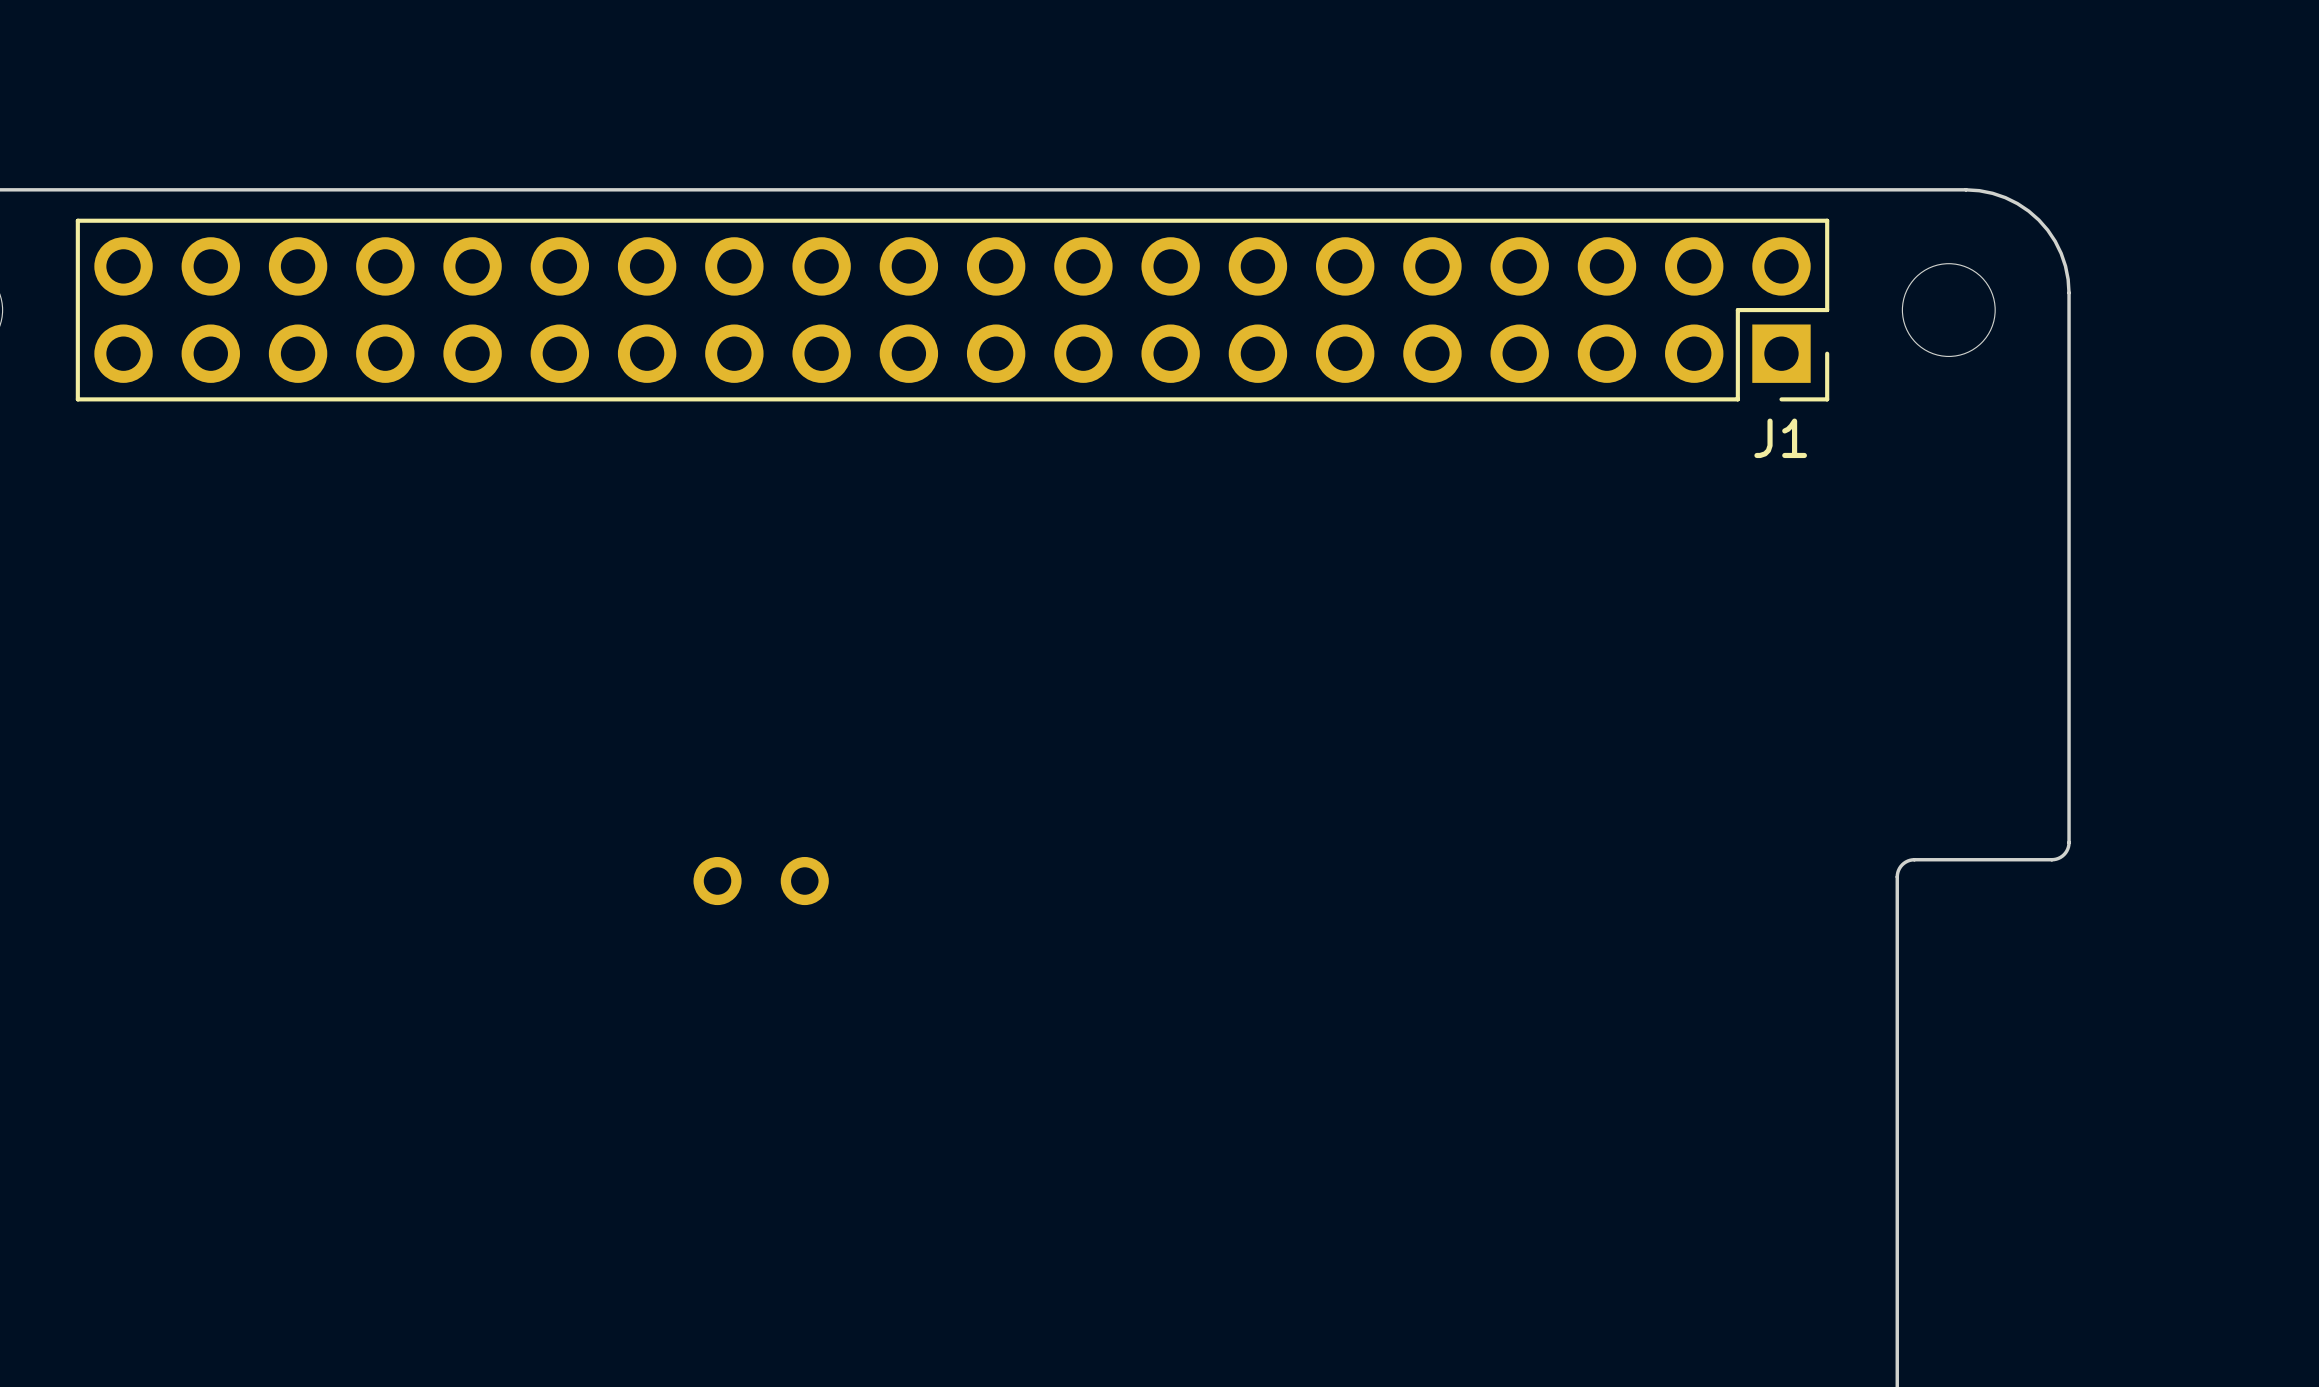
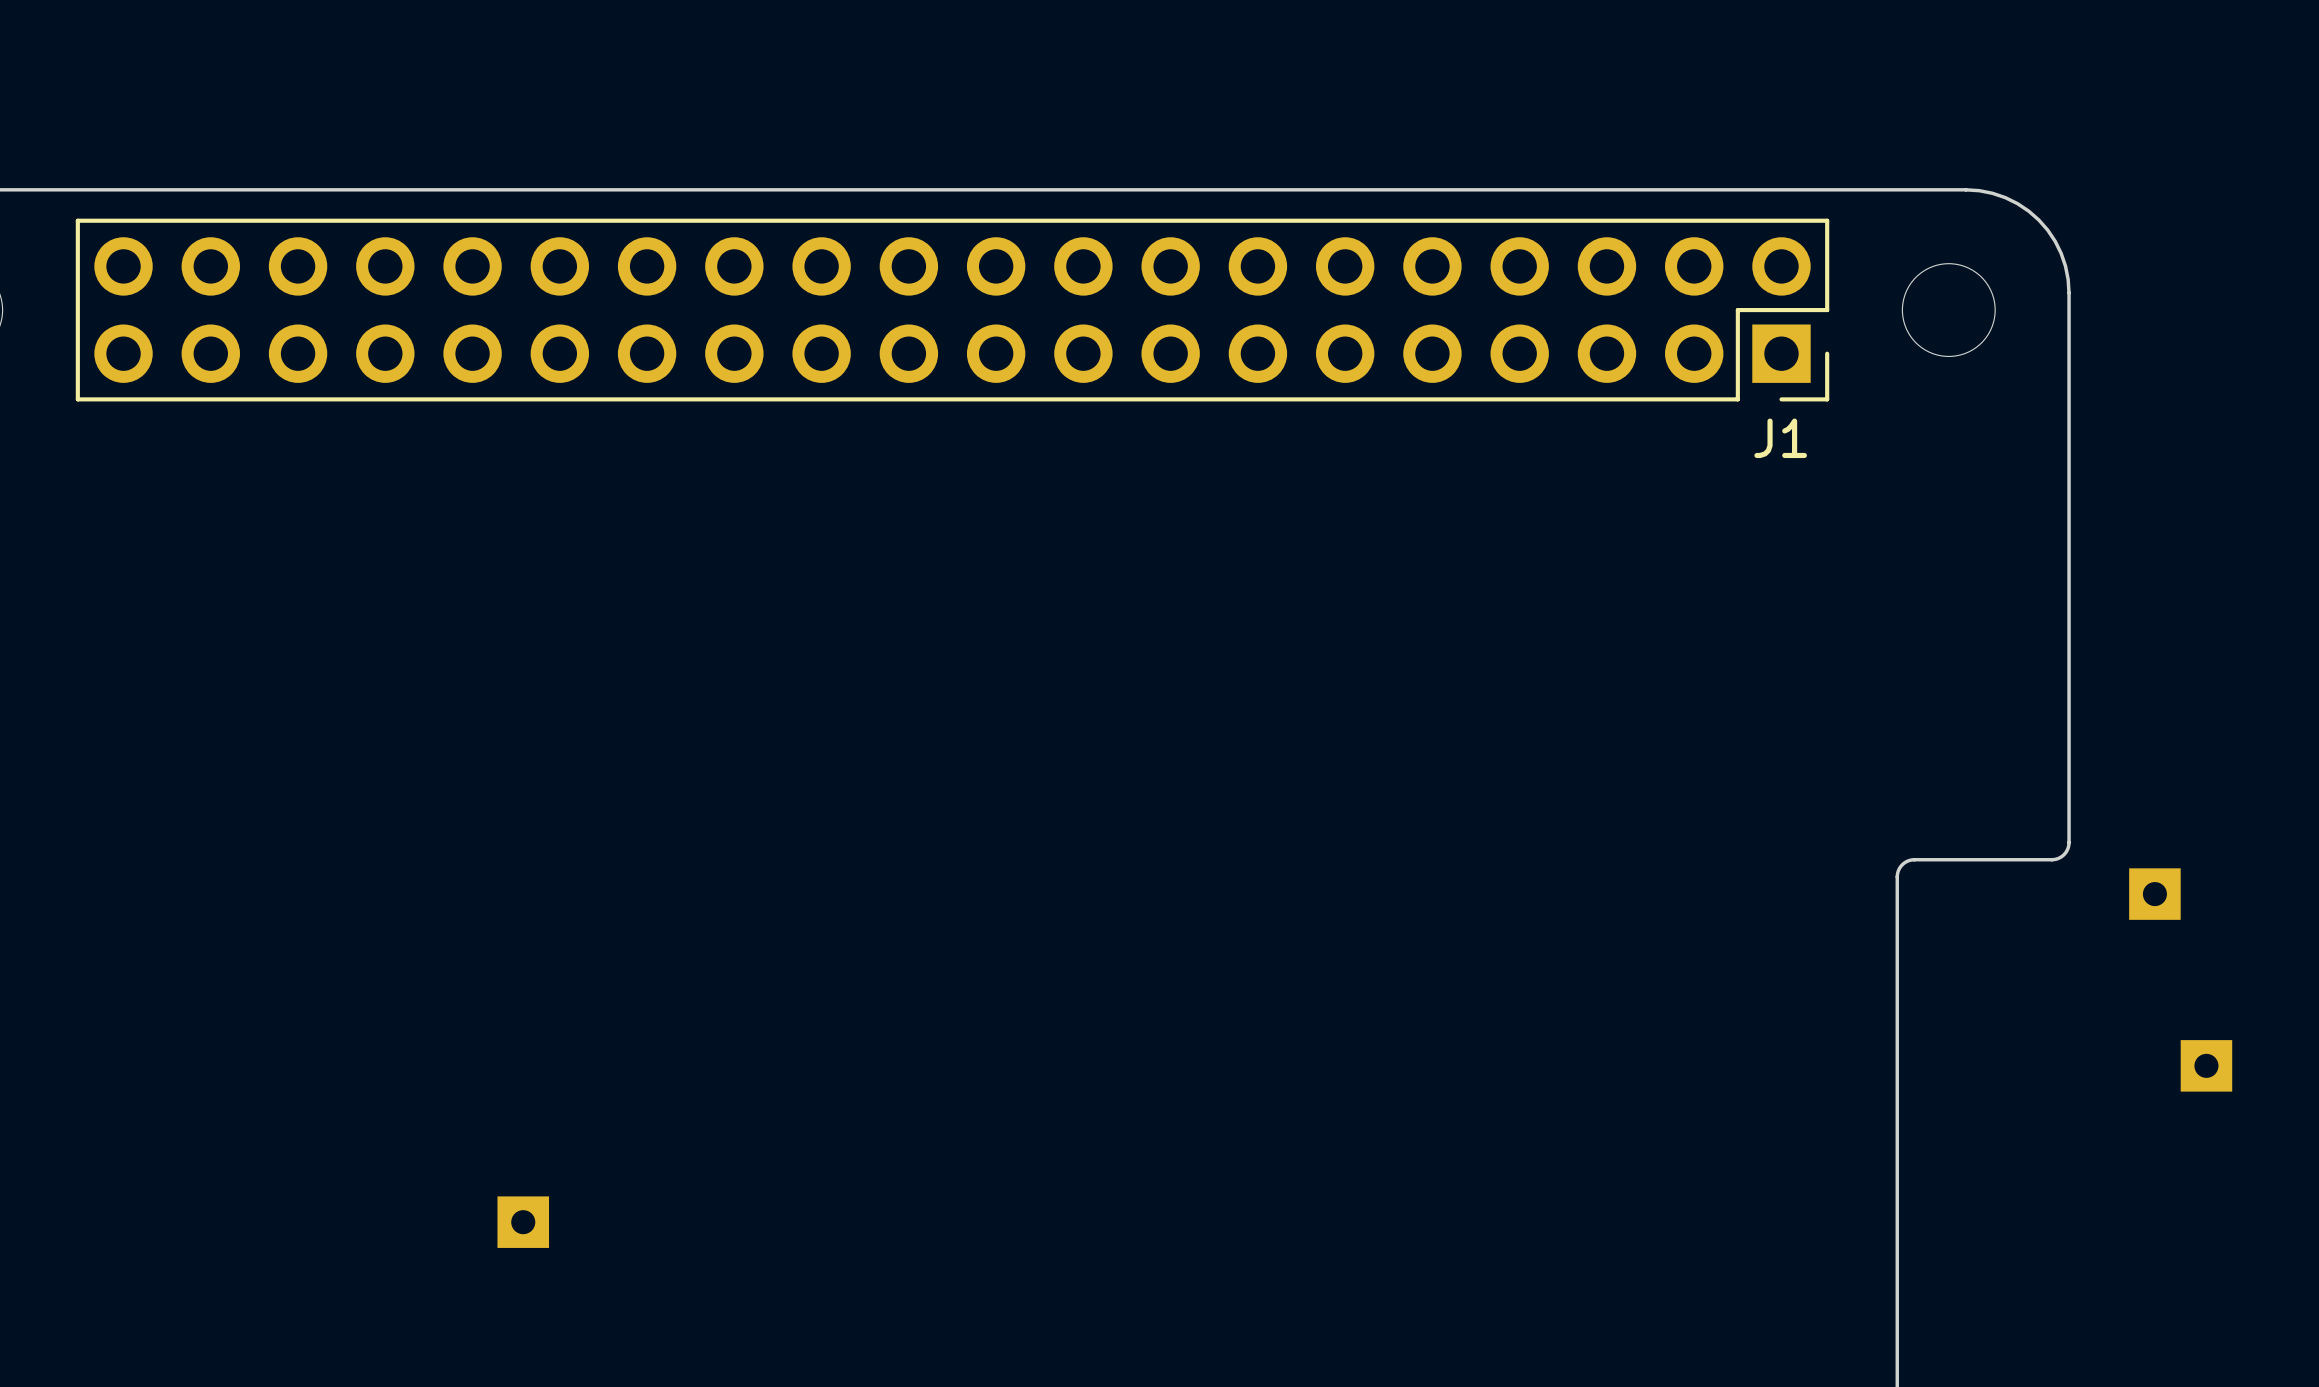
part: (761, 881) -> none
part: none -> (2154, 894)
part: none -> (2206, 1065)
part: none -> (523, 1222)

